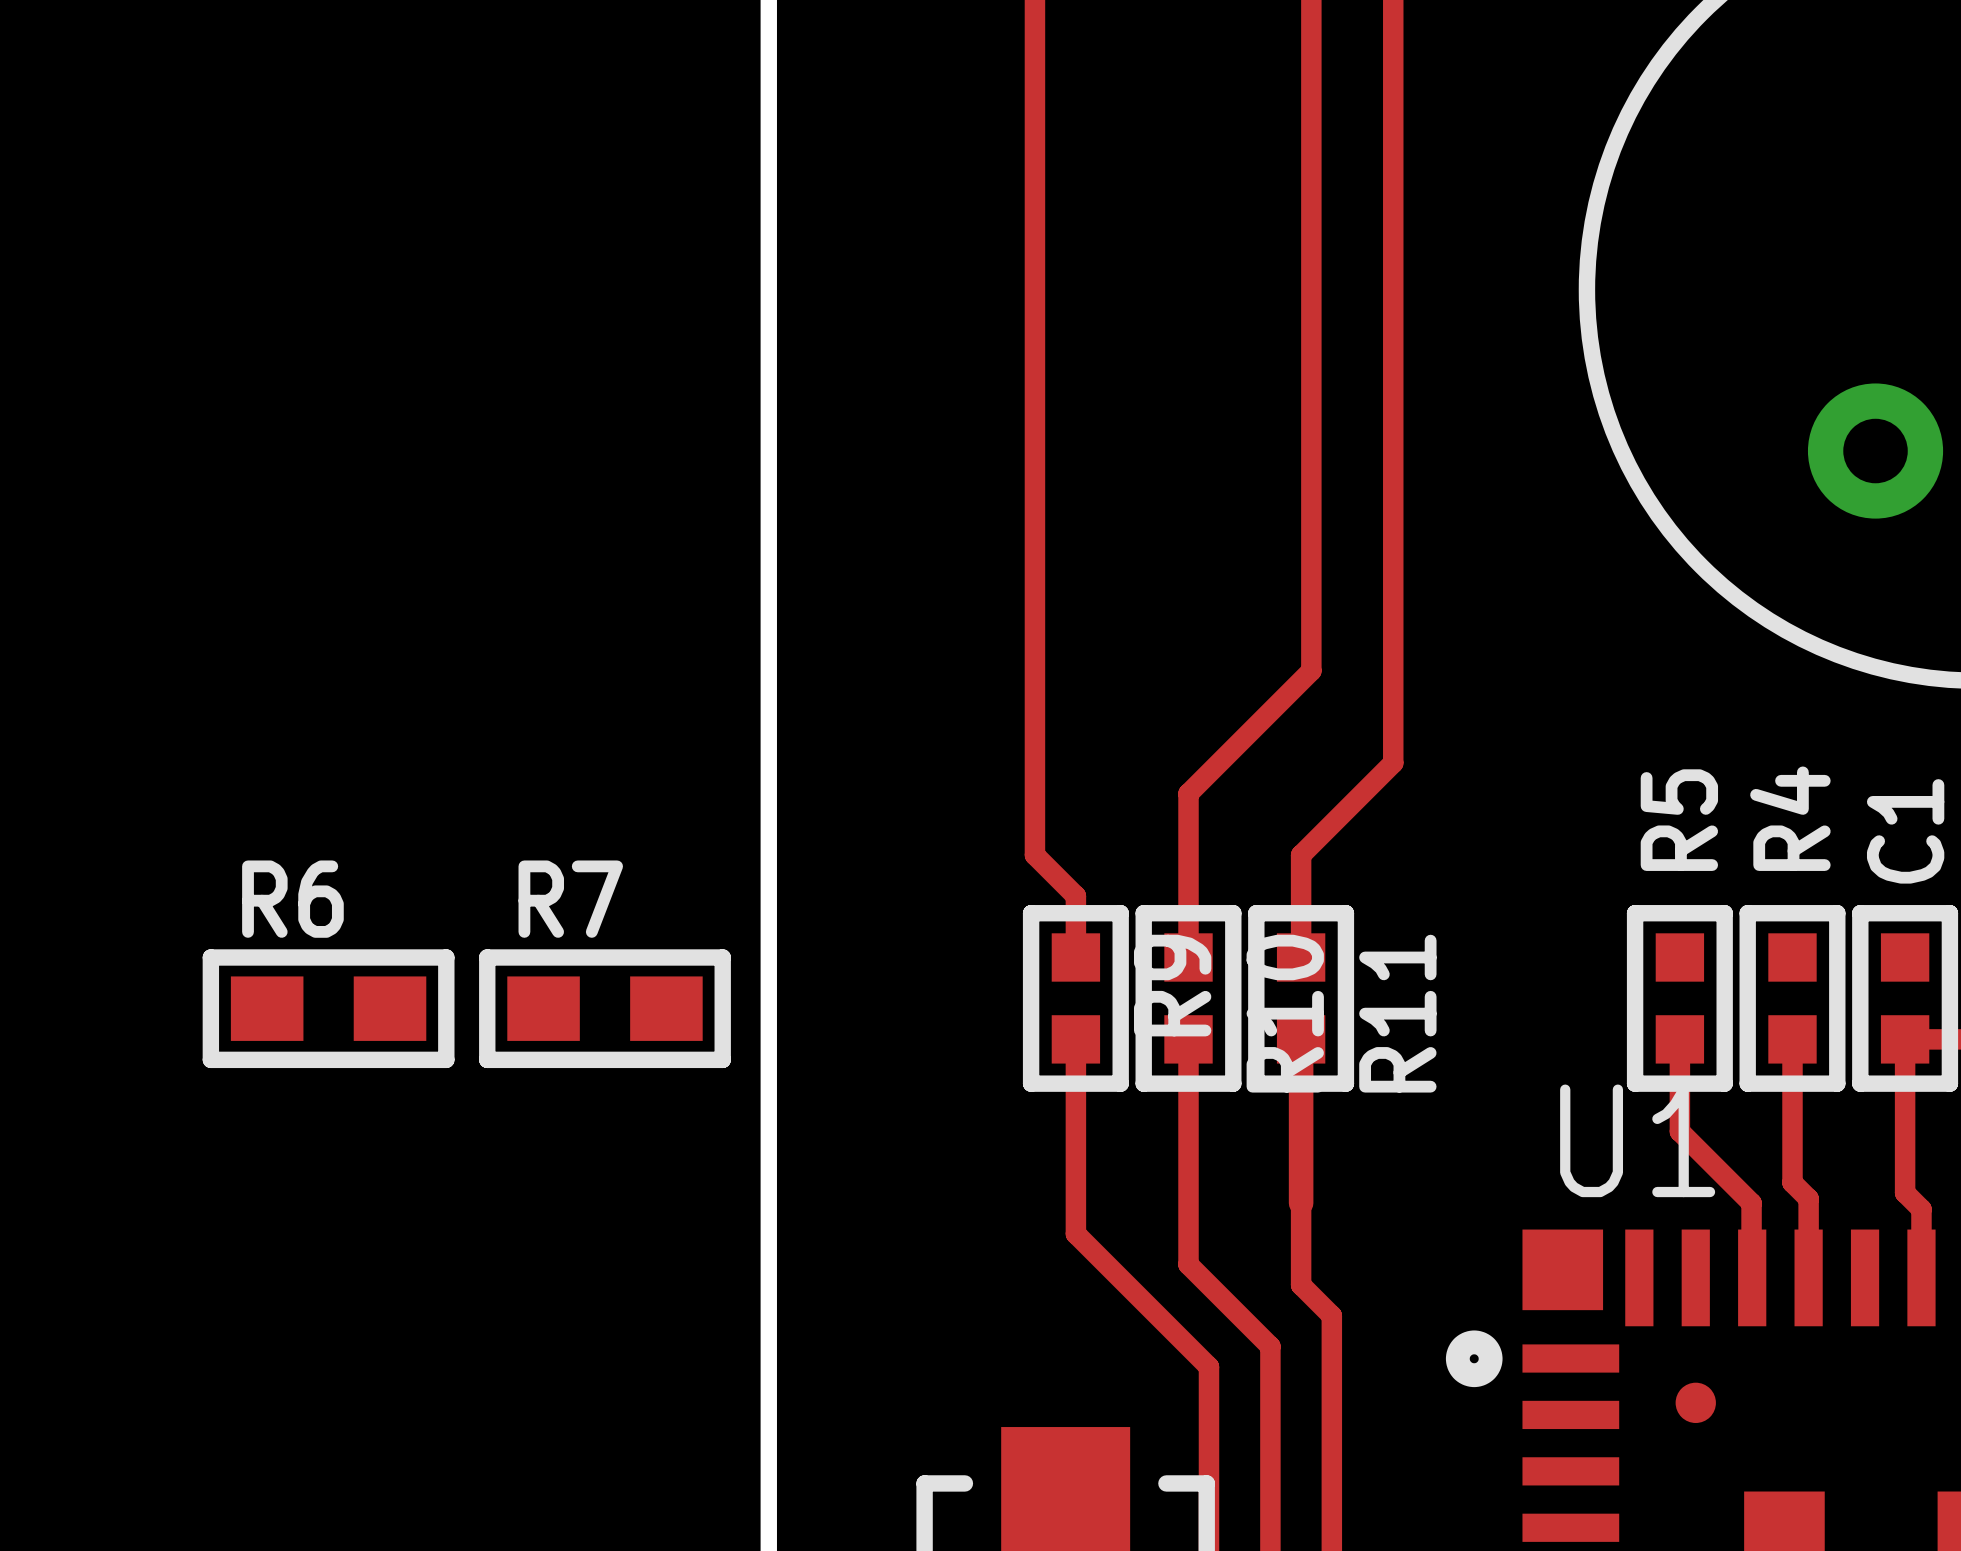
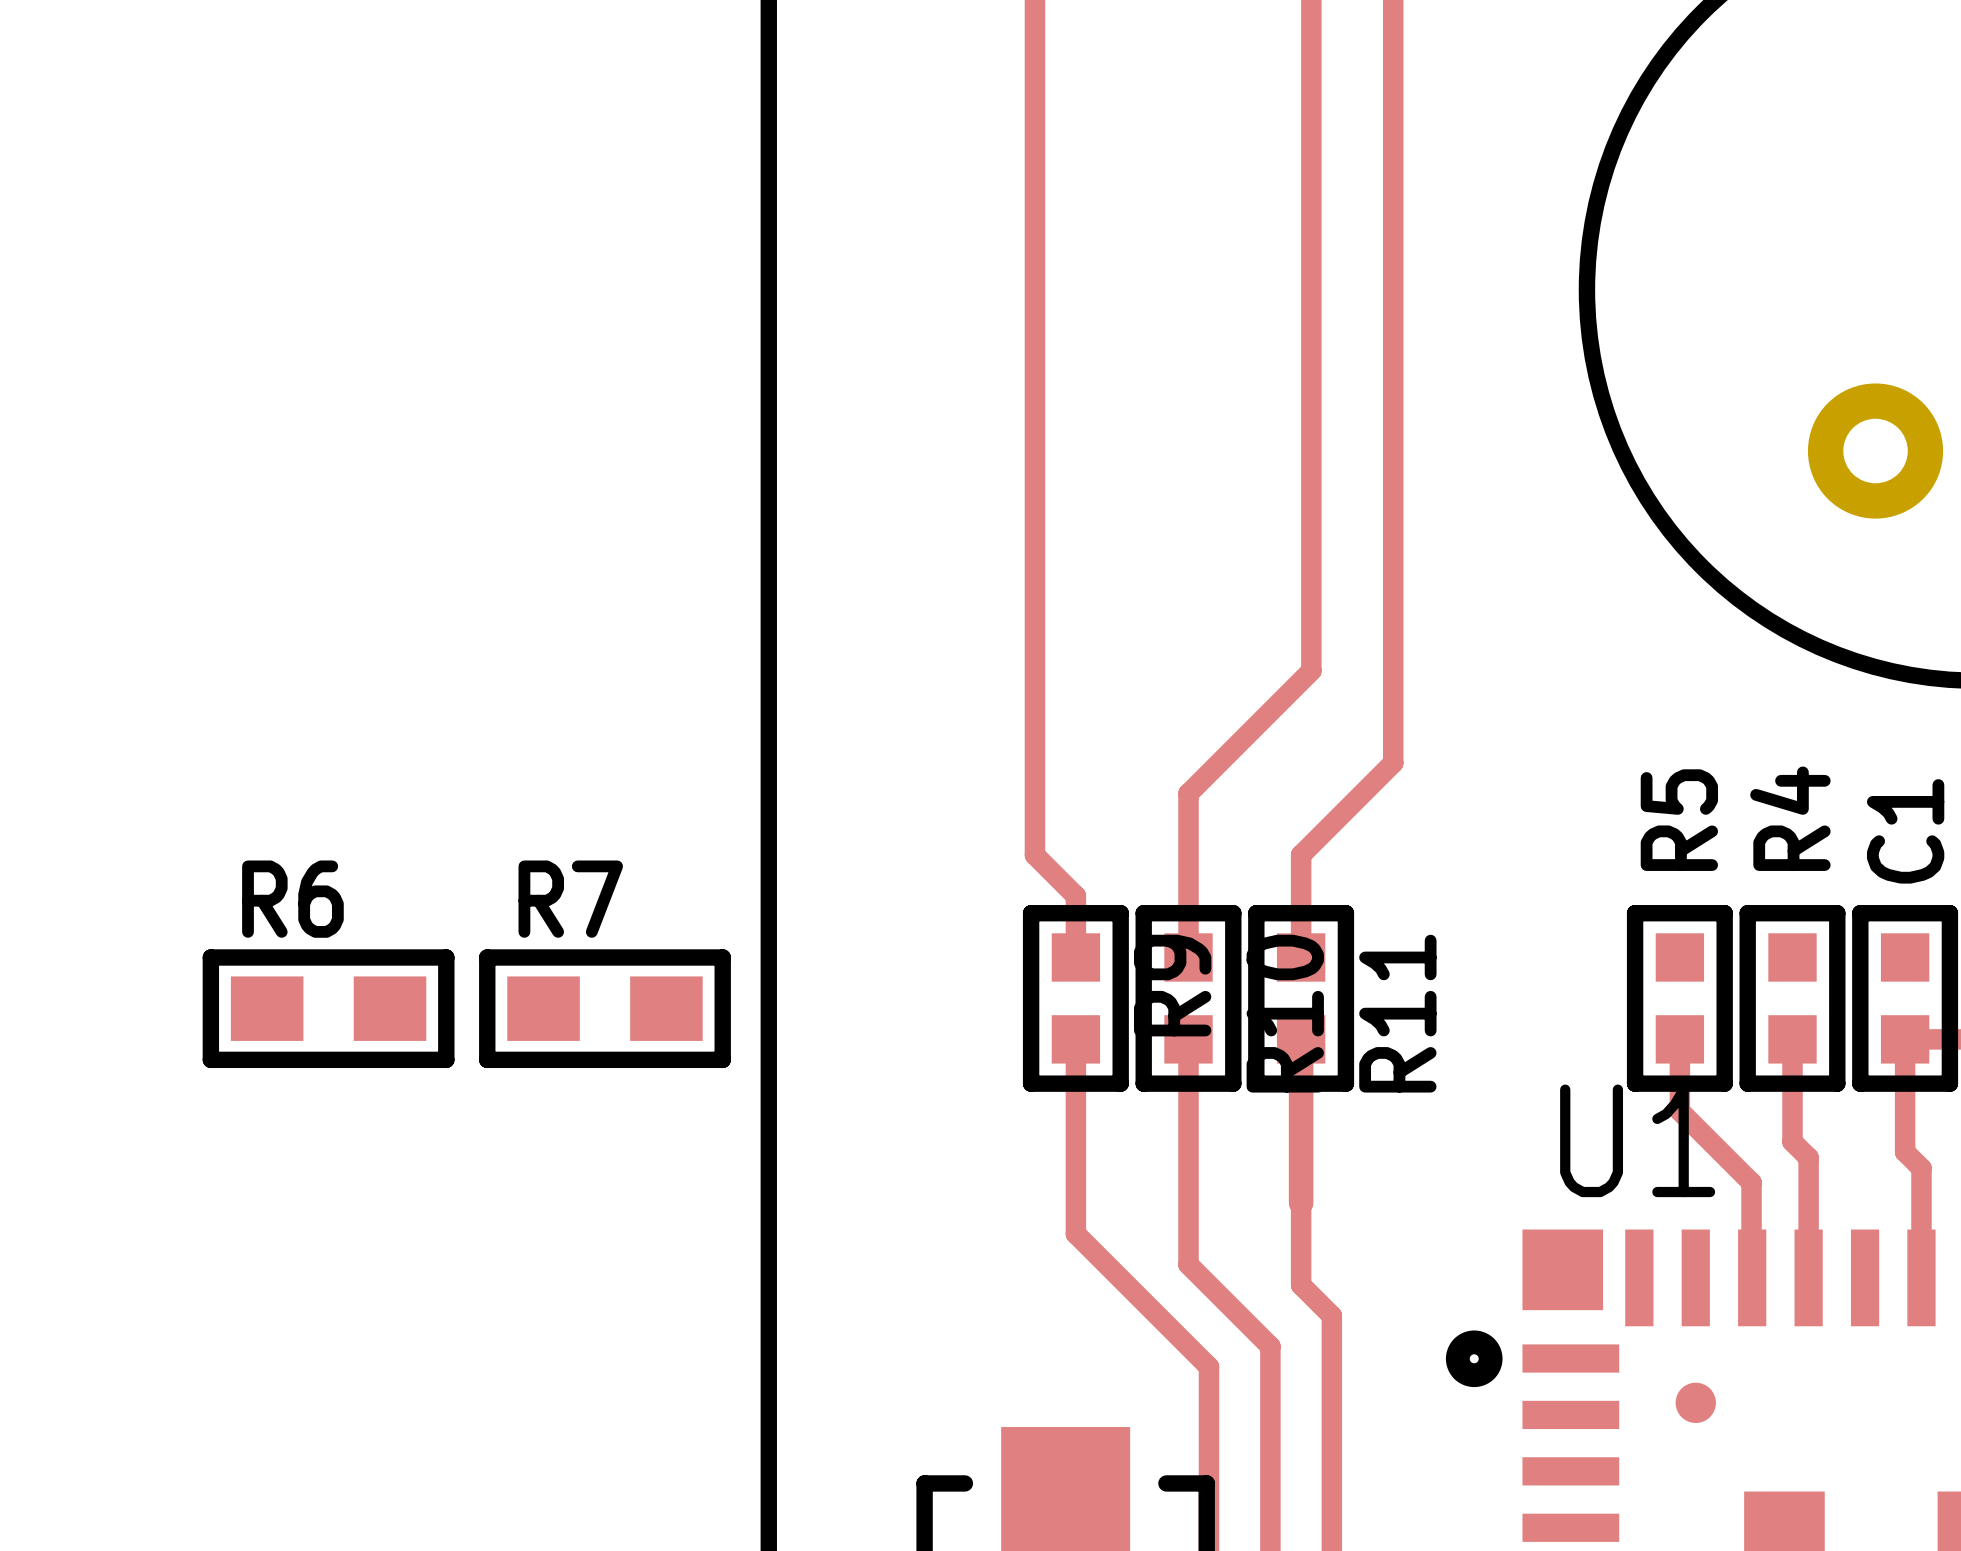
track: (1679, 1111) (1679, 1131) (1751, 1203) -> (1679, 1111) (1751, 1182) (1751, 1203)
track: (1792, 1141) (1792, 1182) (1808, 1198) -> (1792, 1141) (1808, 1157) (1808, 1198)
track: (1905, 1151) (1905, 1192) (1921, 1209) -> (1905, 1151) (1921, 1168) (1921, 1209)

